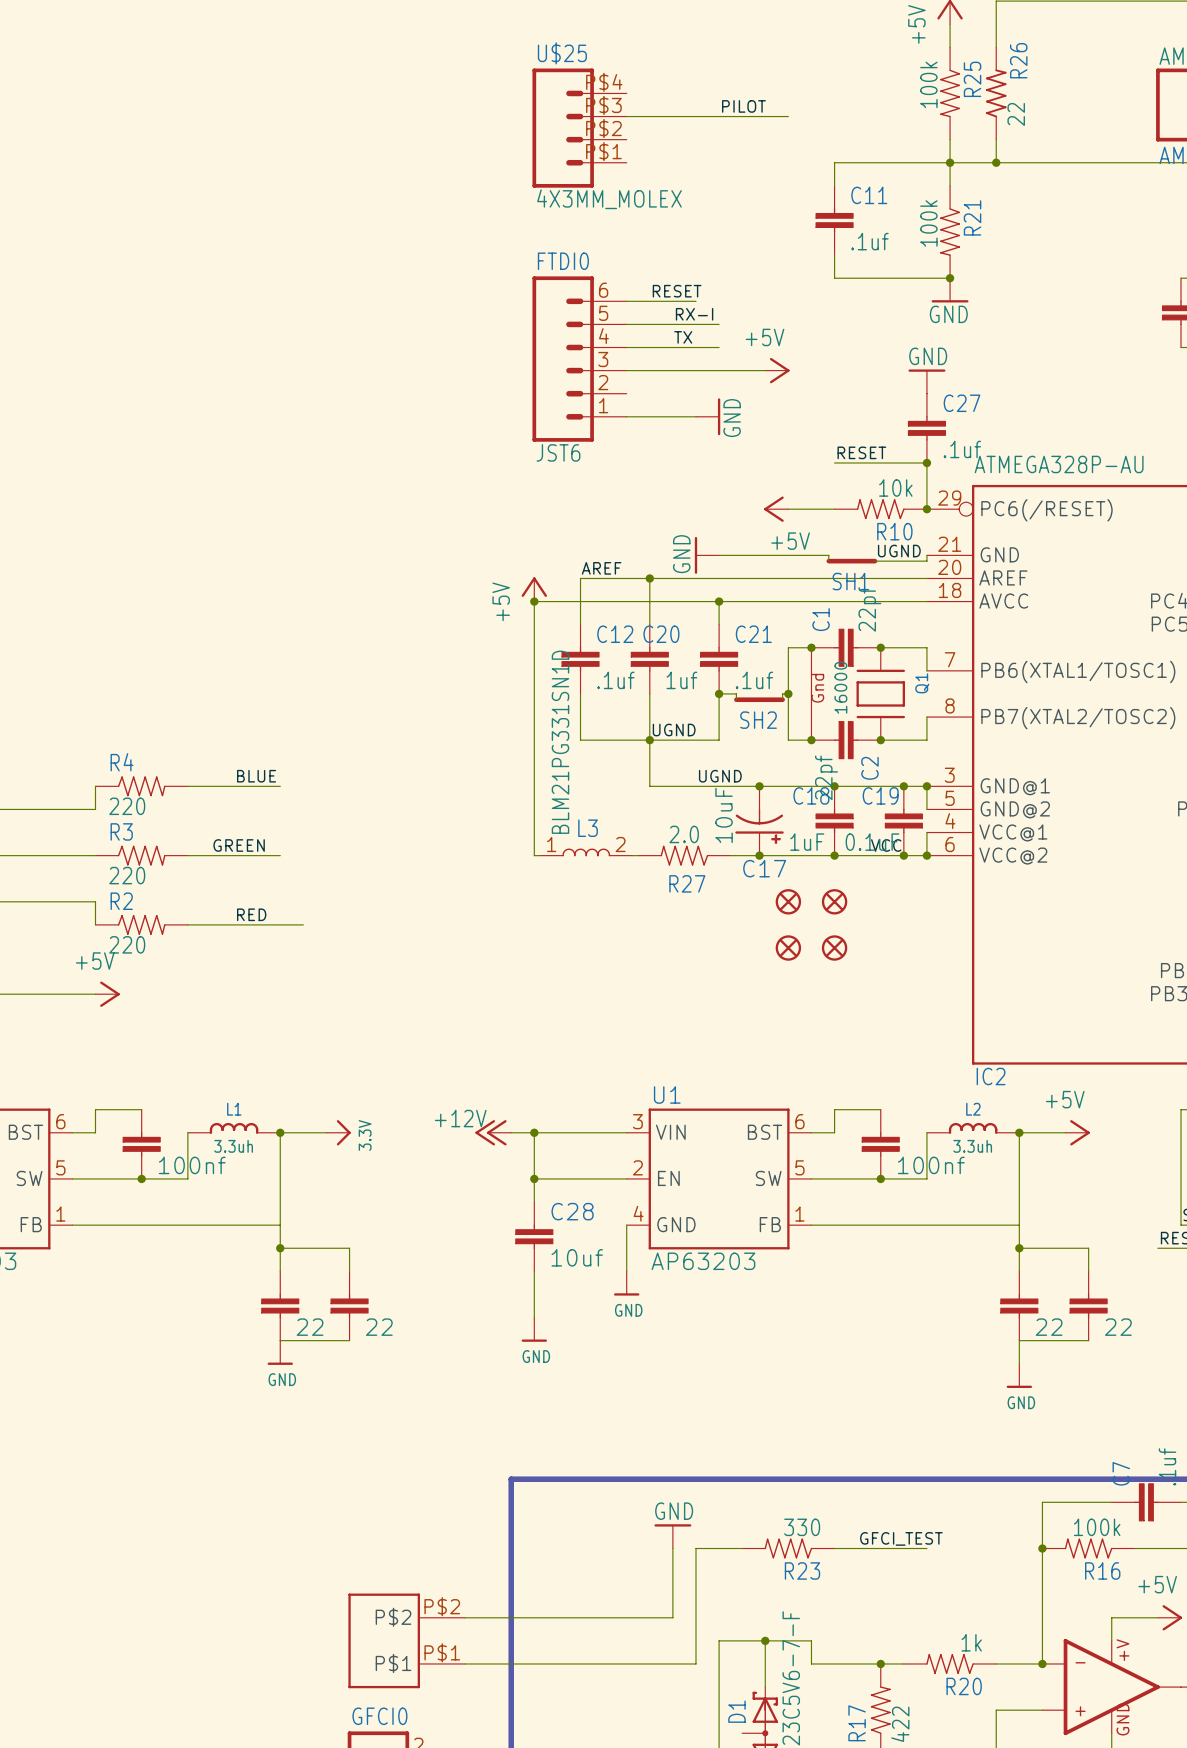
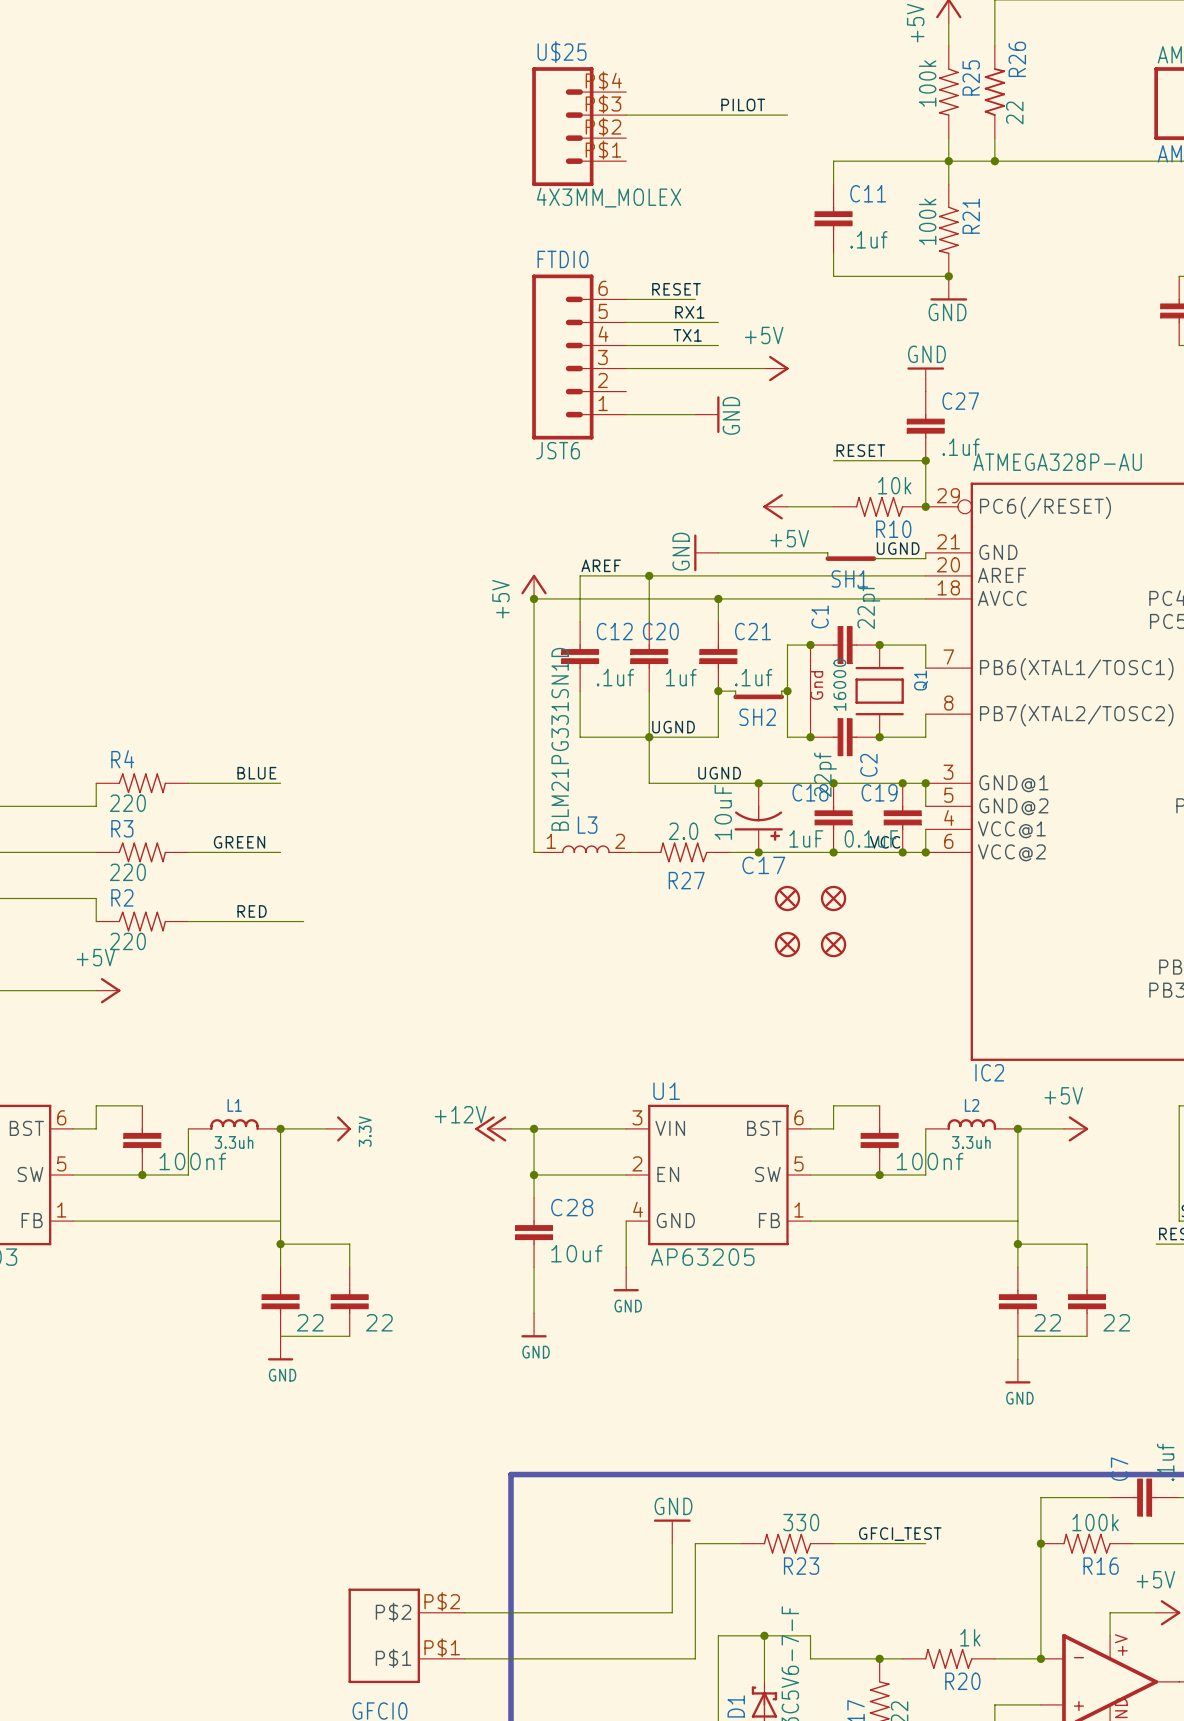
label: RX-I (694, 314) -> RX1 (689, 312)
label: TX (683, 337) -> TX1 (687, 335)
U1 value: AP63203 (703, 1261) -> AP63205 (702, 1257)

